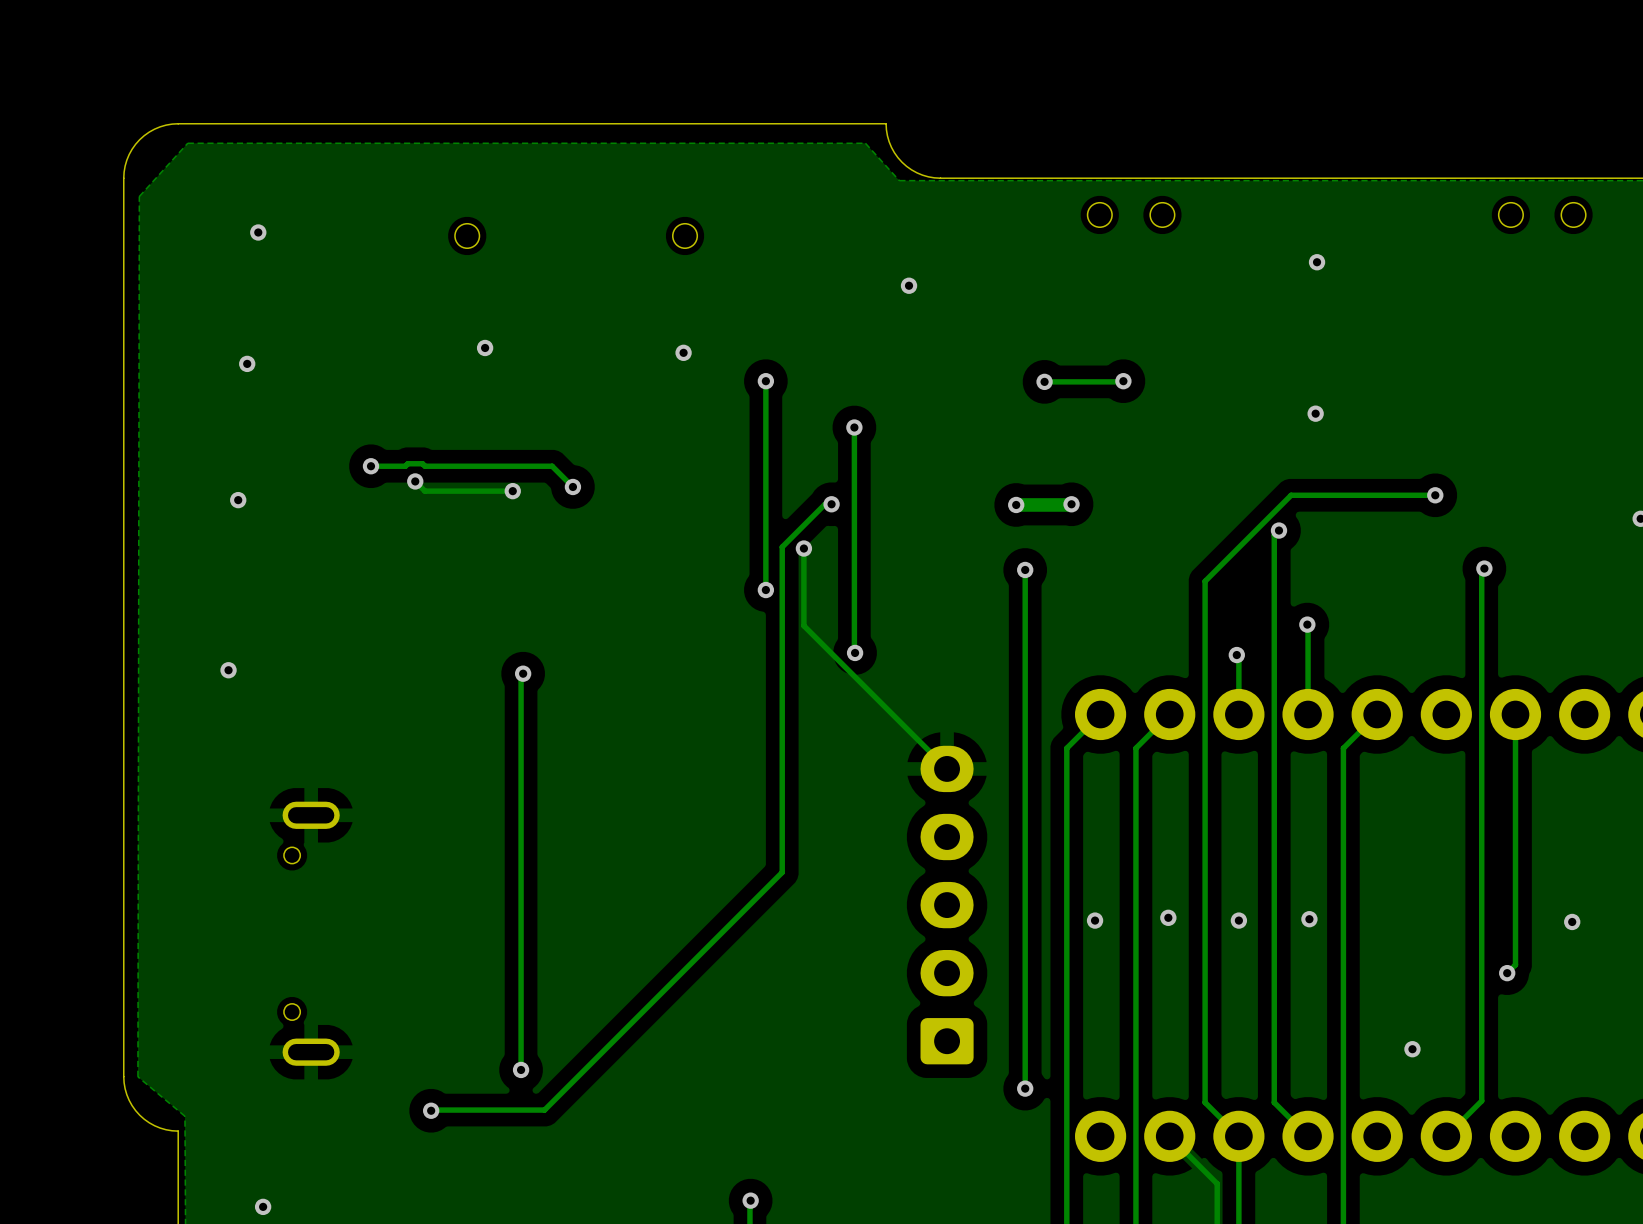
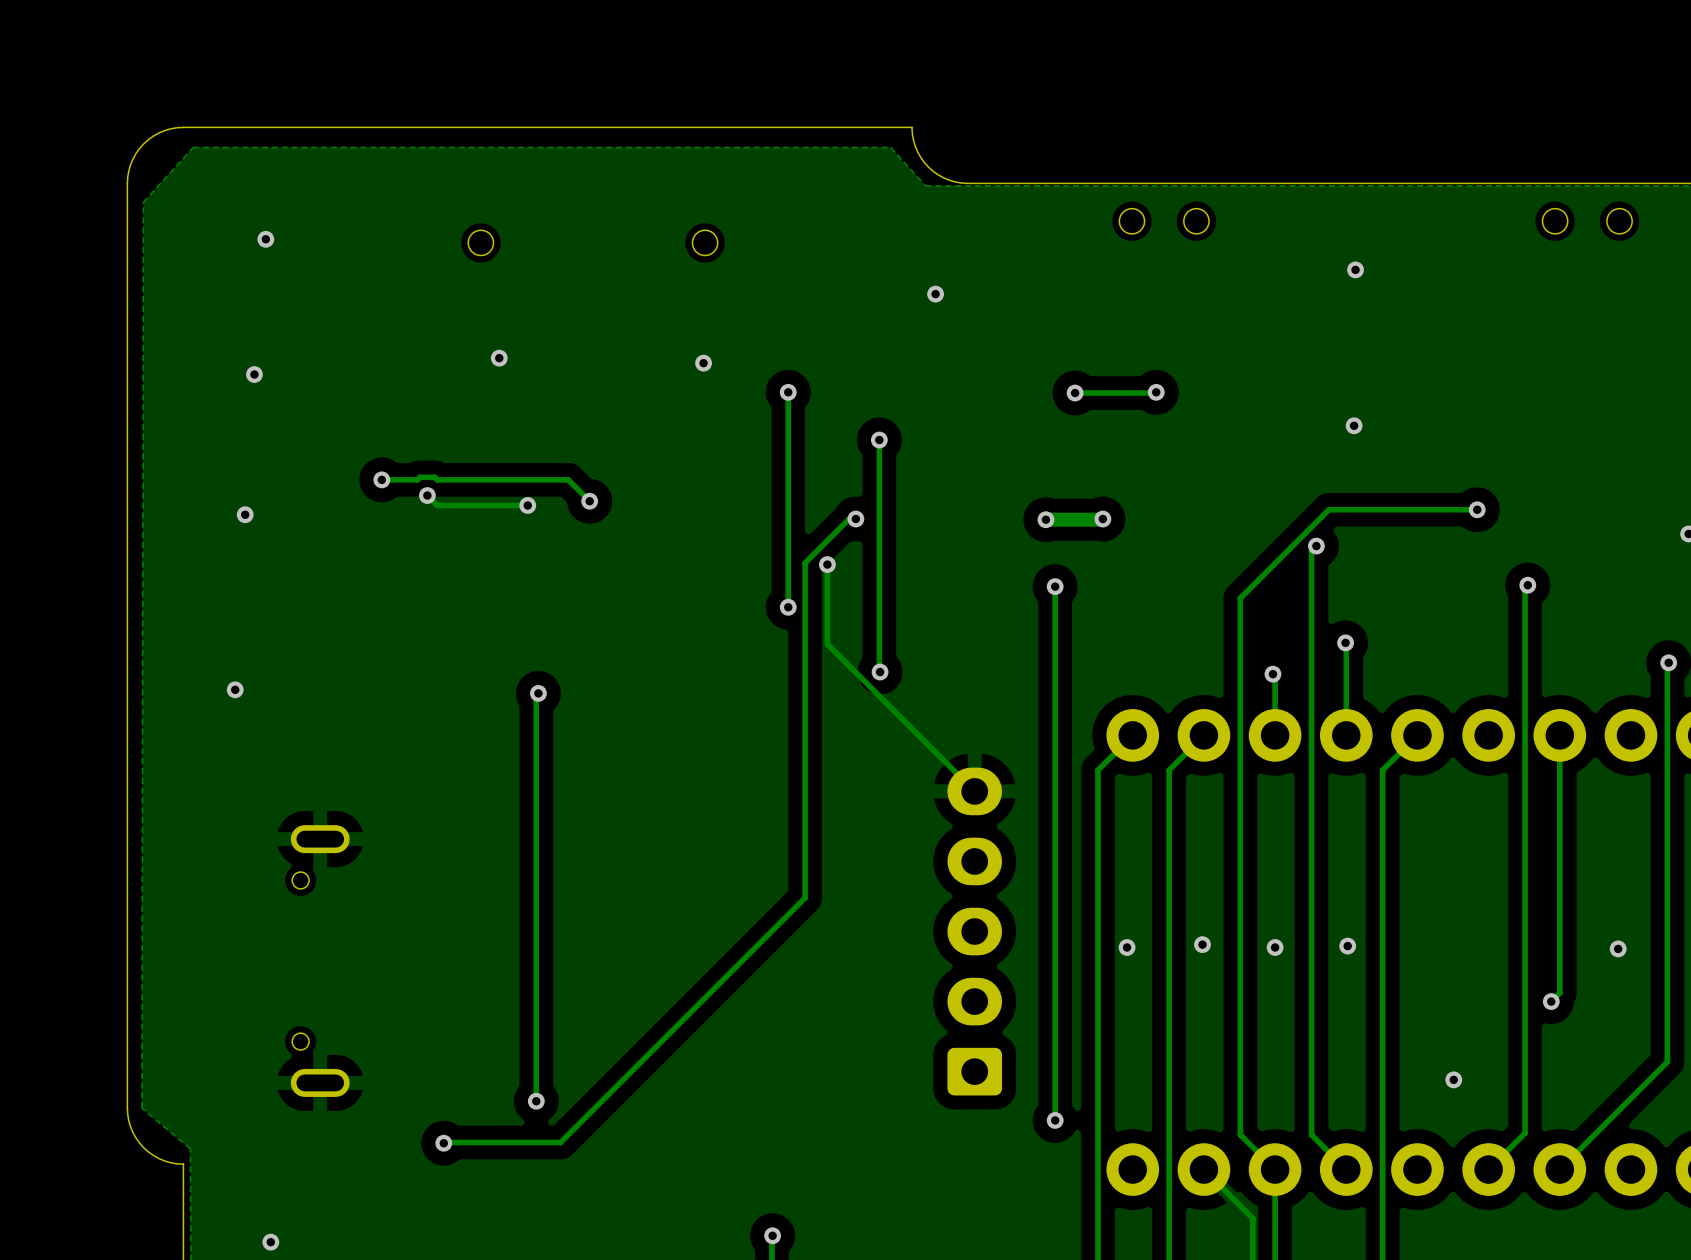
track: none -> (1668, 662) (1667, 1061) (1559, 1169)
via: none -> (1668, 662)

